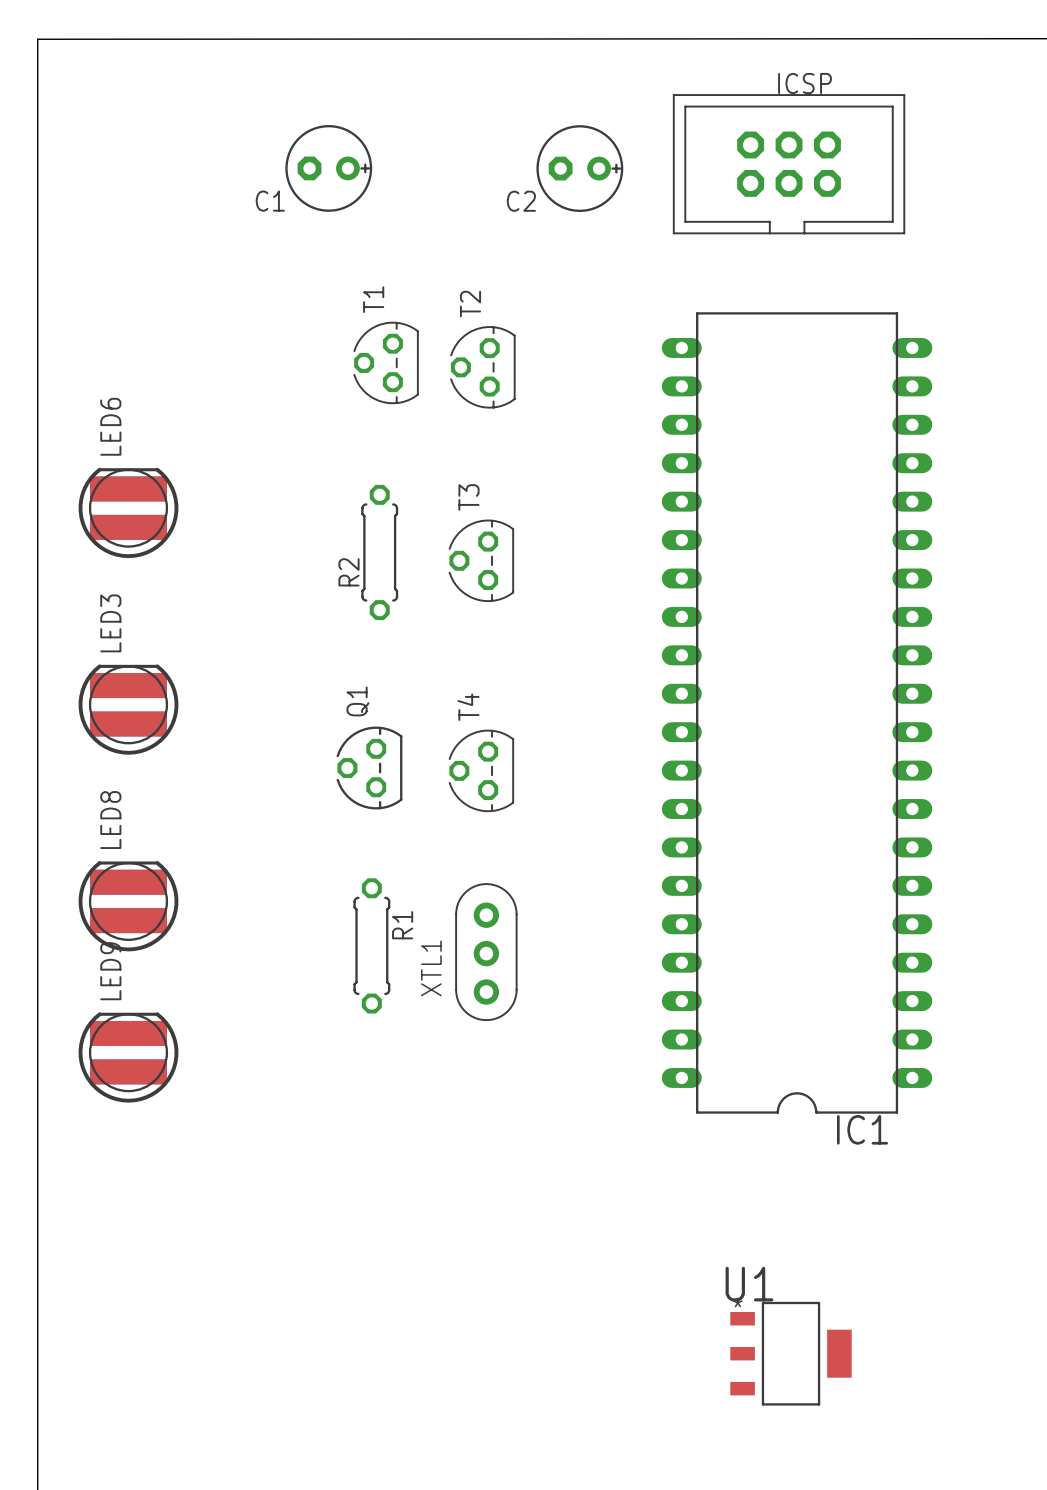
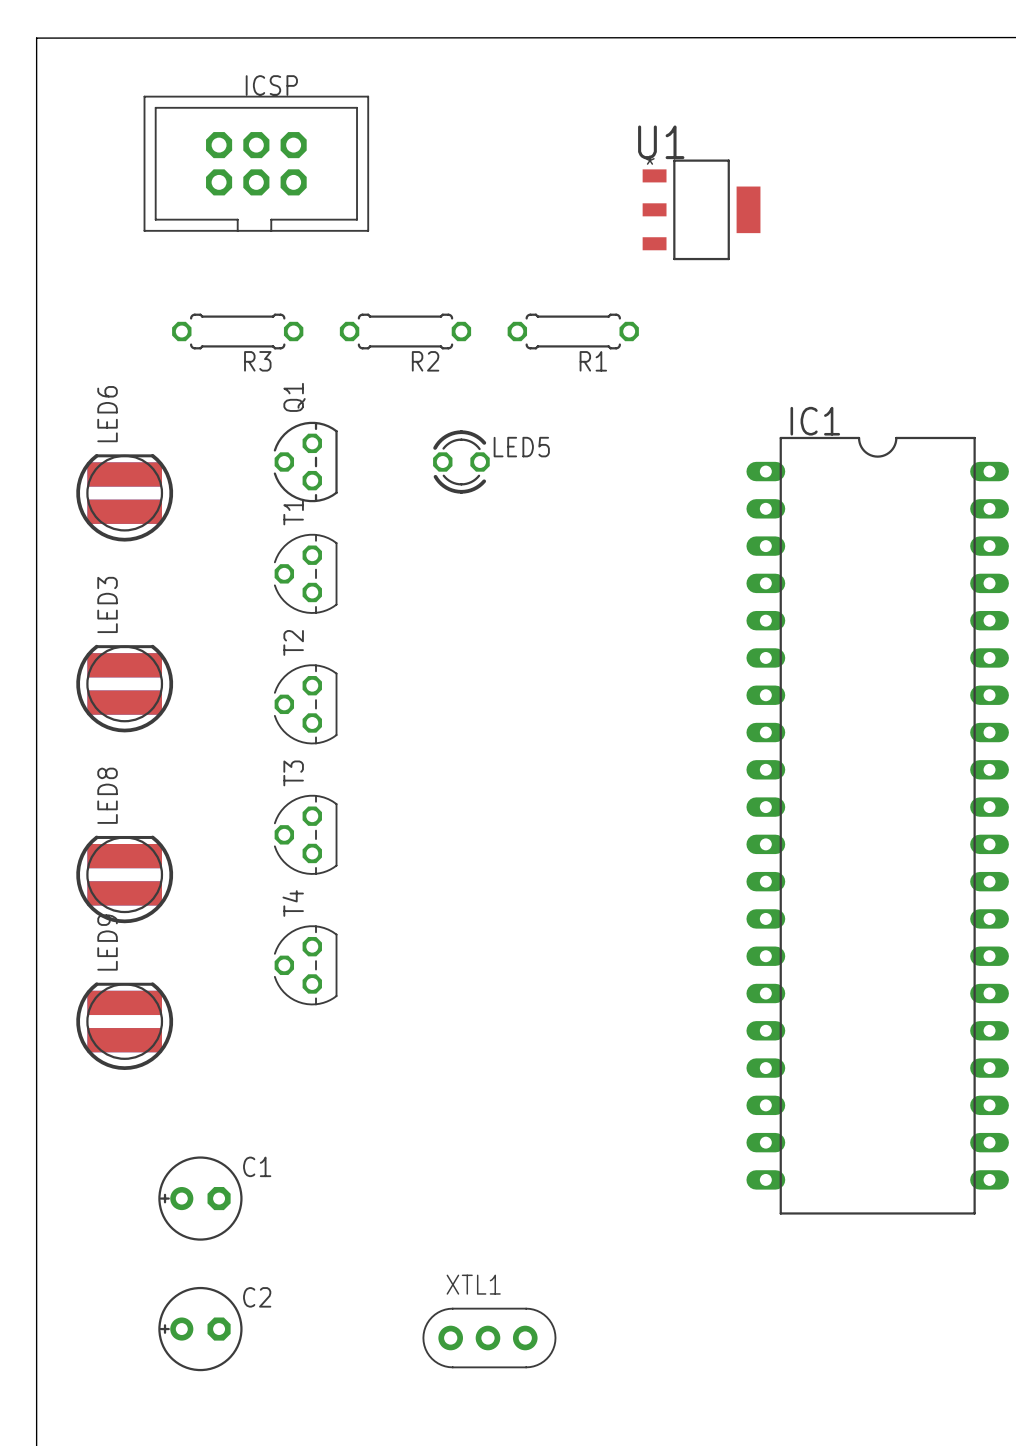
ICSP: (789, 164) -> none
ICSP: none -> (256, 163)
C1 rotation: 0° (328, 168) -> 180° (200, 1198)
C1 position: (328, 168) -> (200, 1198)
C2 rotation: 0° (579, 168) -> 180° (200, 1329)
C2 position: (579, 168) -> (200, 1329)
R3: none -> (237, 331)
T1 position: (386, 362) -> (305, 573)
T2 position: (482, 367) -> (305, 704)
LED5: none -> (461, 462)
R2 rotation: 0° (379, 552) -> 90° clockwise (405, 331)
R2 position: (379, 552) -> (405, 331)
T3 position: (481, 560) -> (305, 834)
R2 name position: R2 (349, 572) -> R2 (425, 361)
IC1 rotation: 0° (797, 712) -> 180° (877, 825)
Q1 position: (369, 768) -> (305, 461)
T4 position: (481, 770) -> (305, 965)
R1 rotation: 0° (371, 945) -> 90° clockwise (573, 331)
R1 position: (371, 945) -> (573, 331)
XTL1 rotation: 0° (486, 952) -> 90° clockwise (489, 1338)
XTL1 position: (486, 952) -> (489, 1338)
U1 position: (791, 1353) -> (701, 209)

